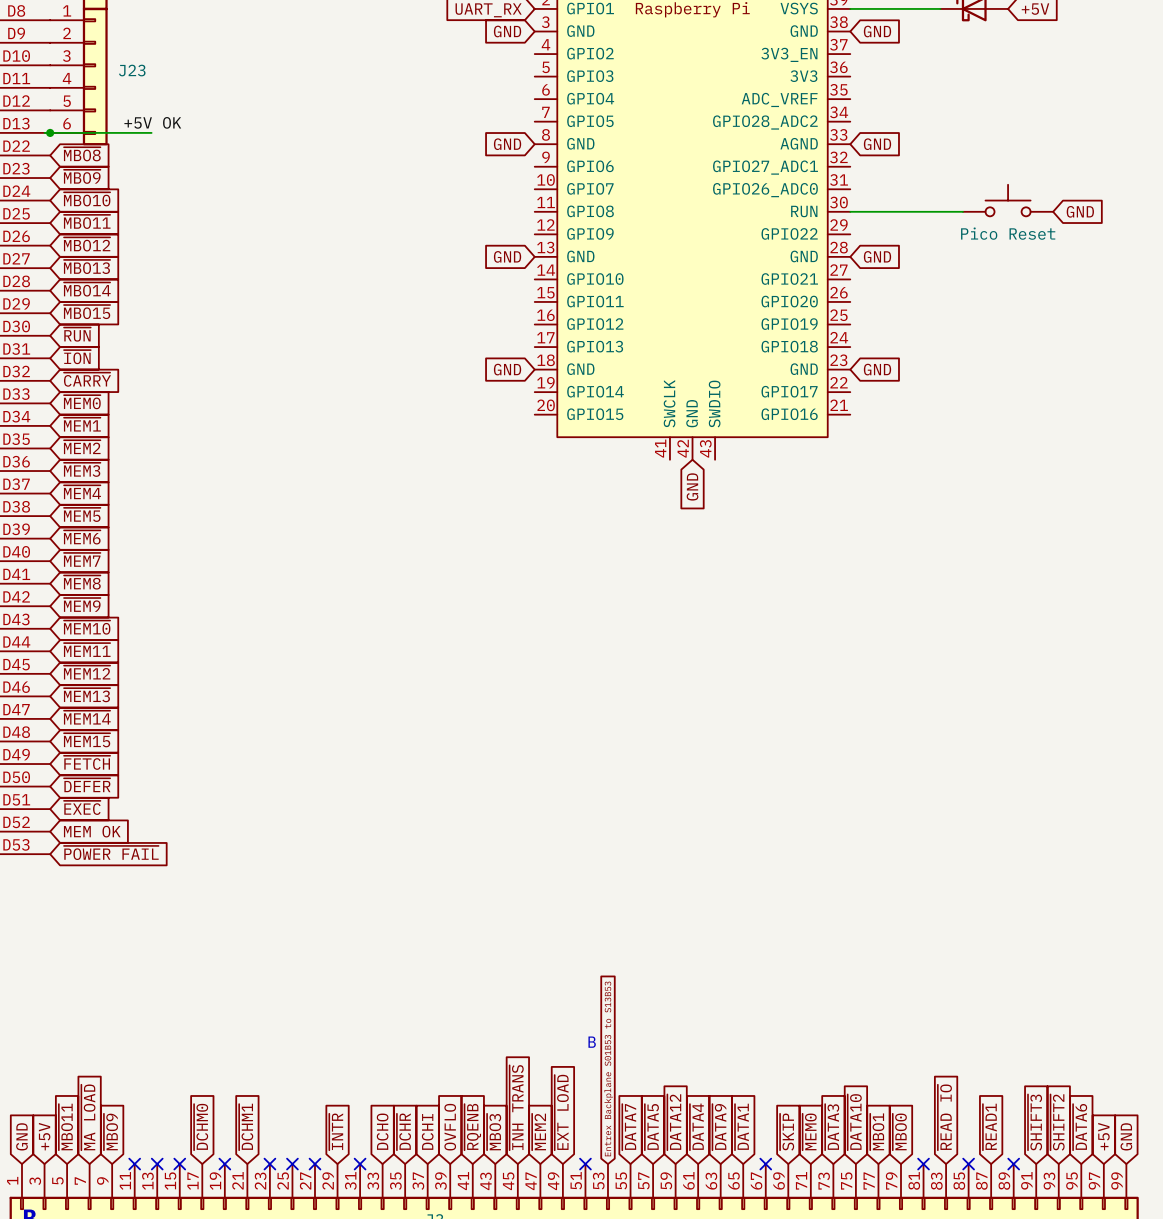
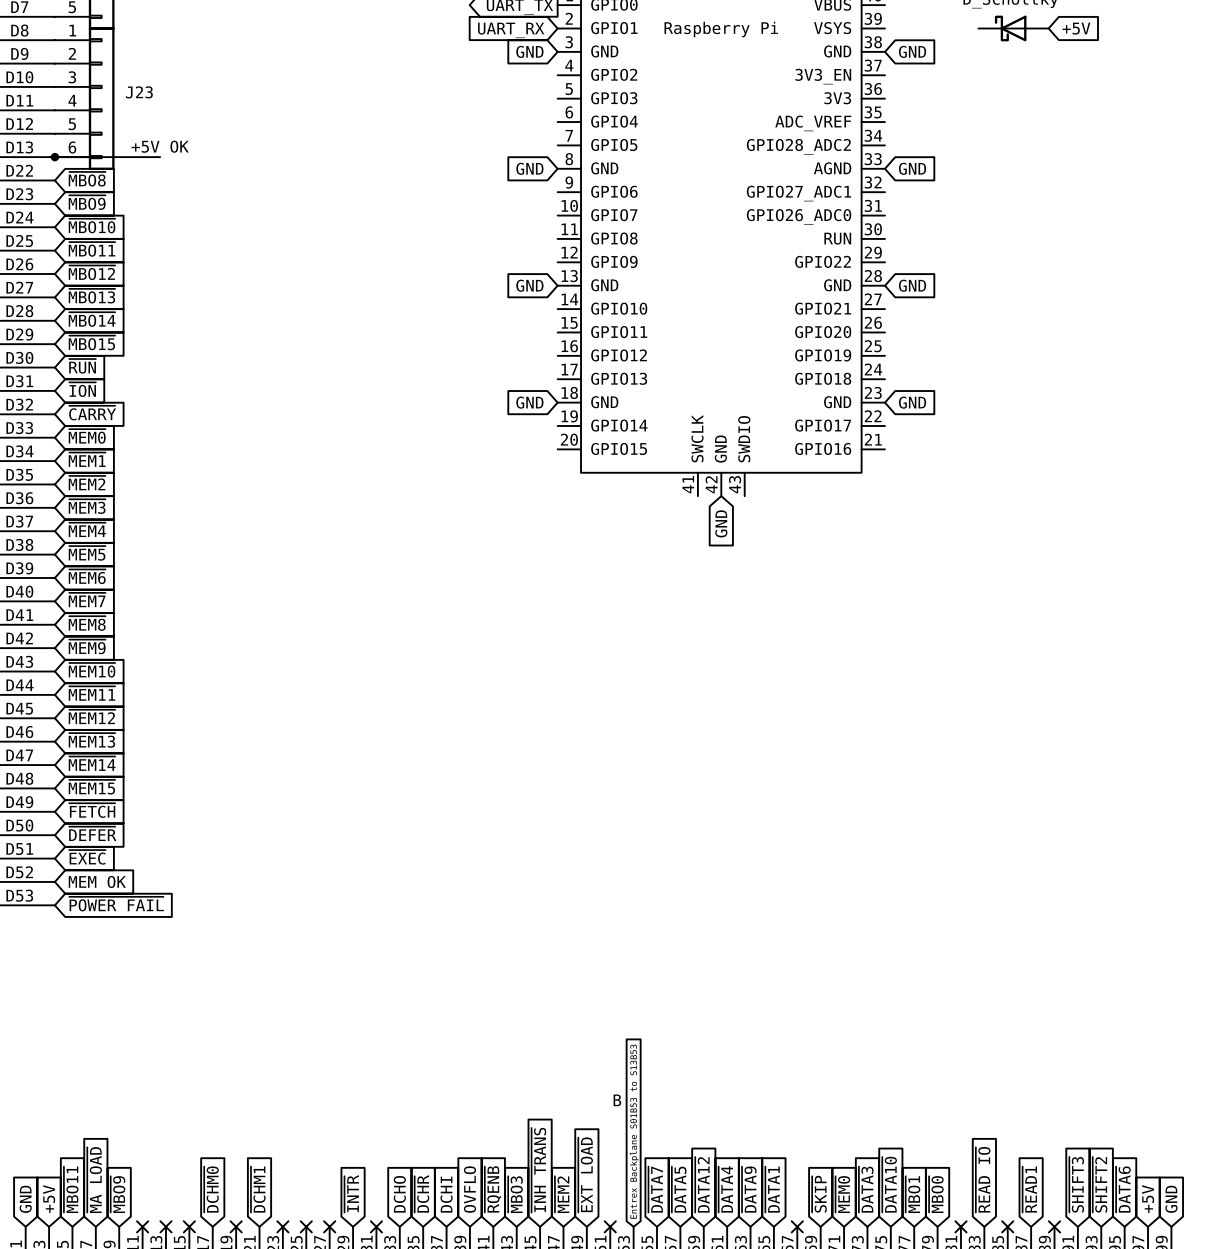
wire: (850, 8) (940, 8) -> none
part: Pico Reset (1008, 200) -> none
wire: (850, 211) (962, 211) -> none
global label: GND (1080, 211) -> none

